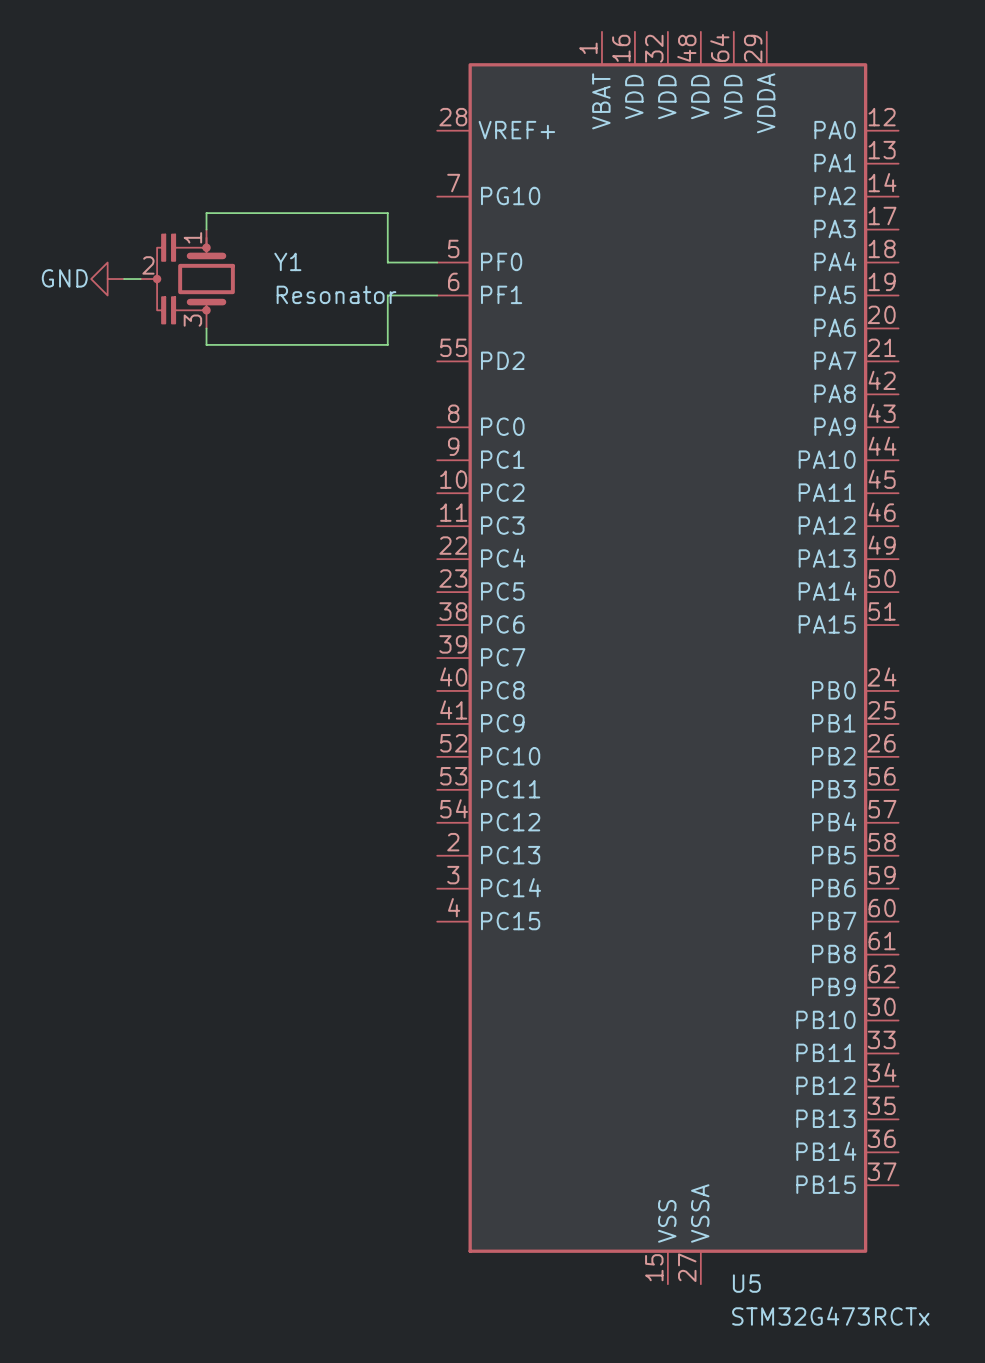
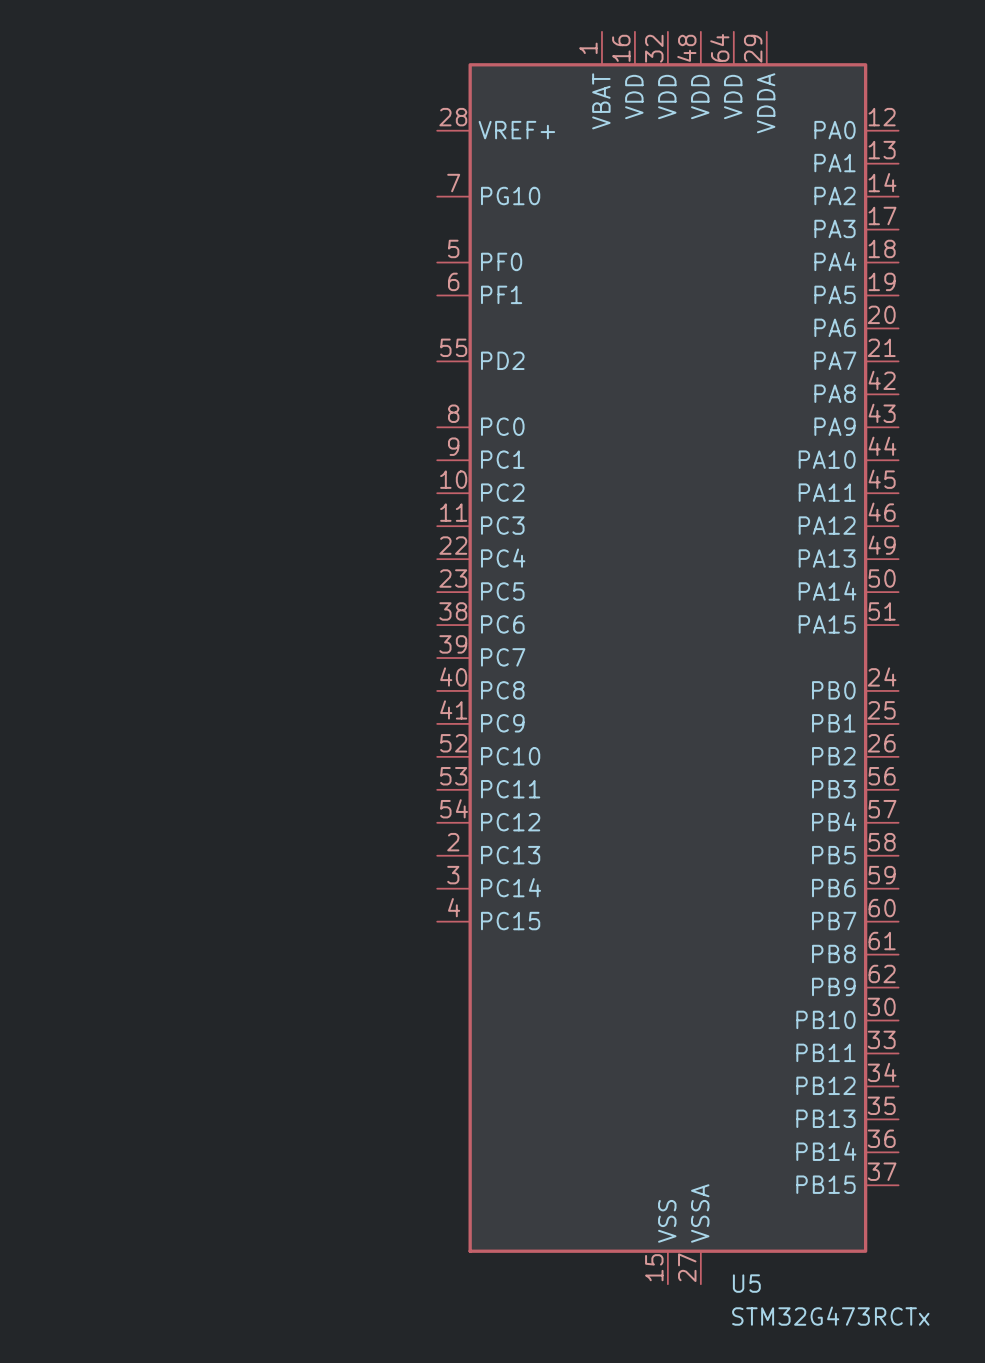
wire: (206, 229) (206, 213) (387, 213) (387, 262) (437, 262) -> none
power symbol: GND (107, 279) -> none
wire: (124, 279) (140, 279) -> none
Y1: Resonator (187, 279) -> none
wire: (437, 295) (387, 295) (387, 344) (206, 344) (206, 328) -> none

